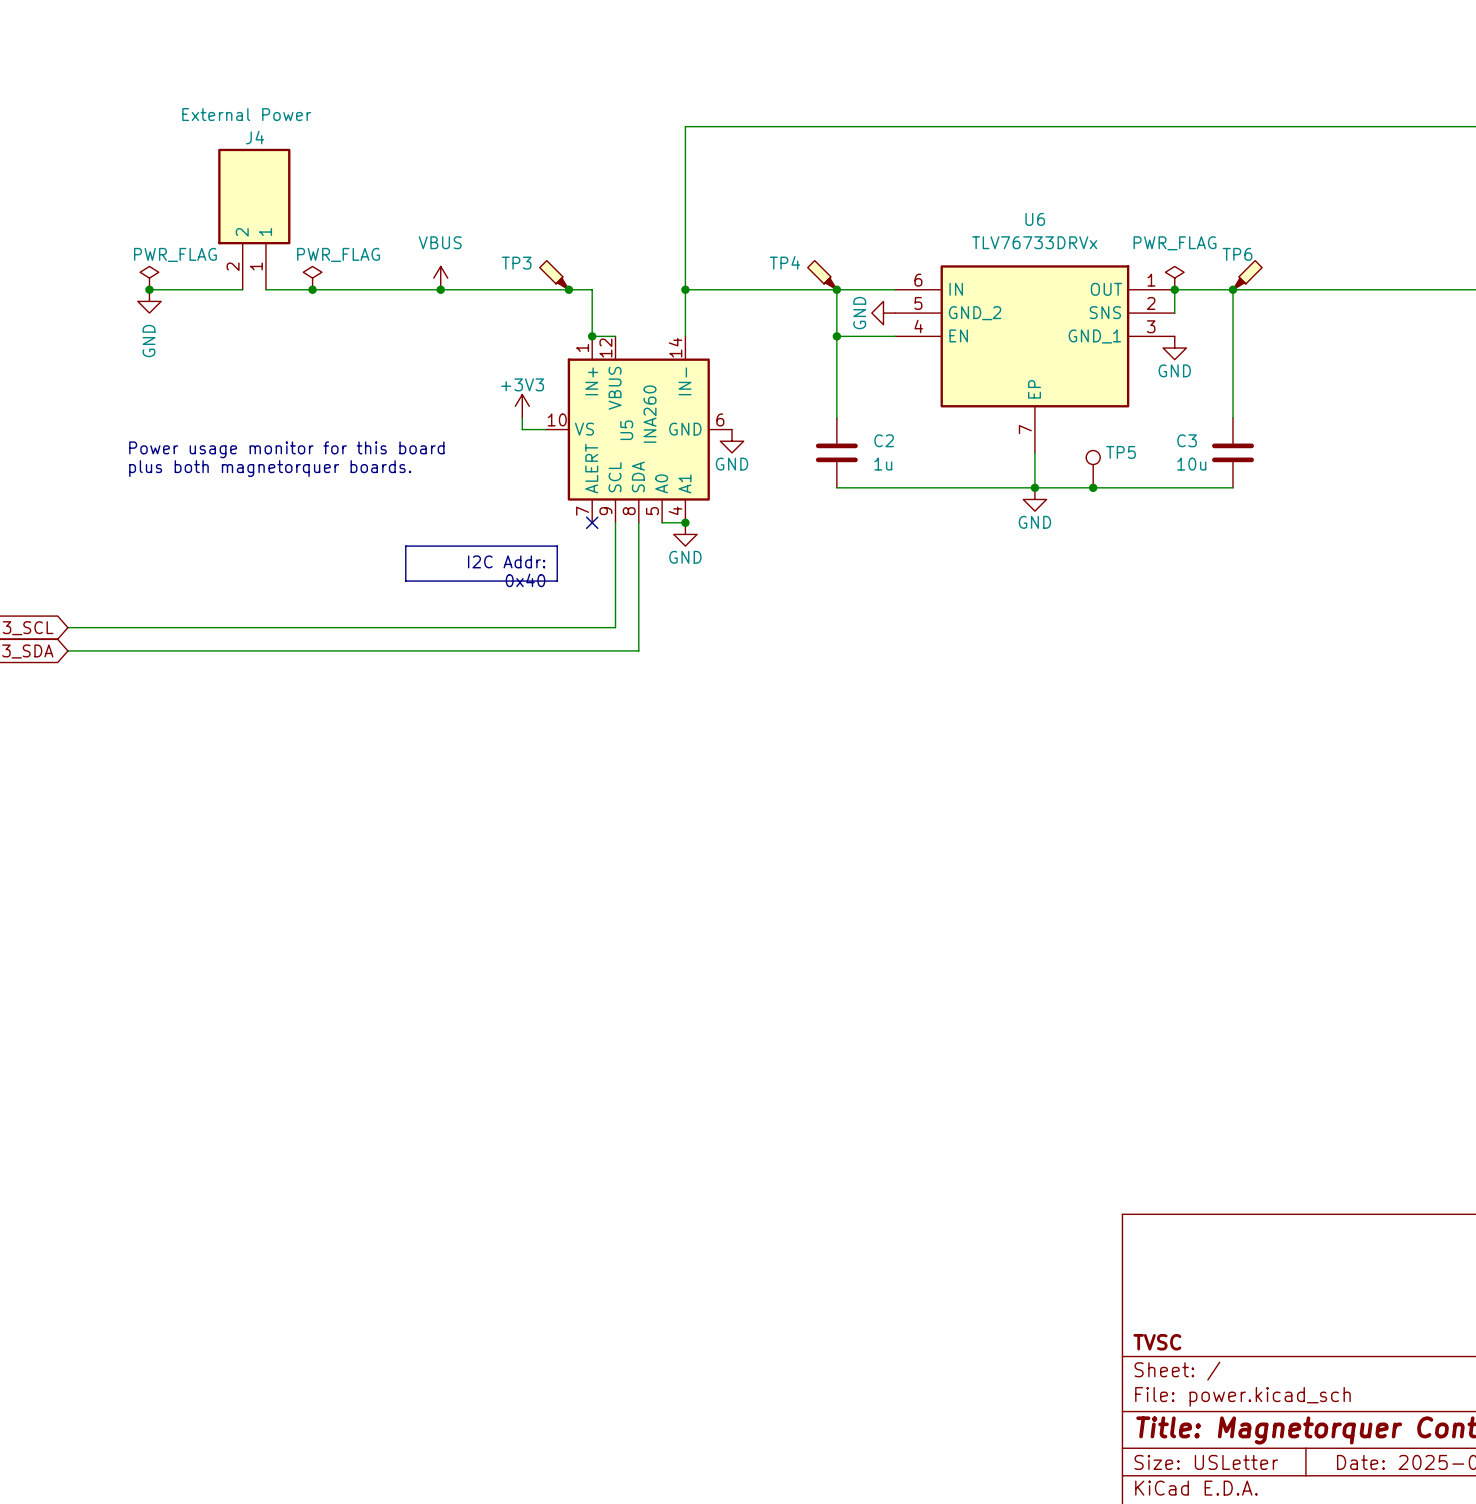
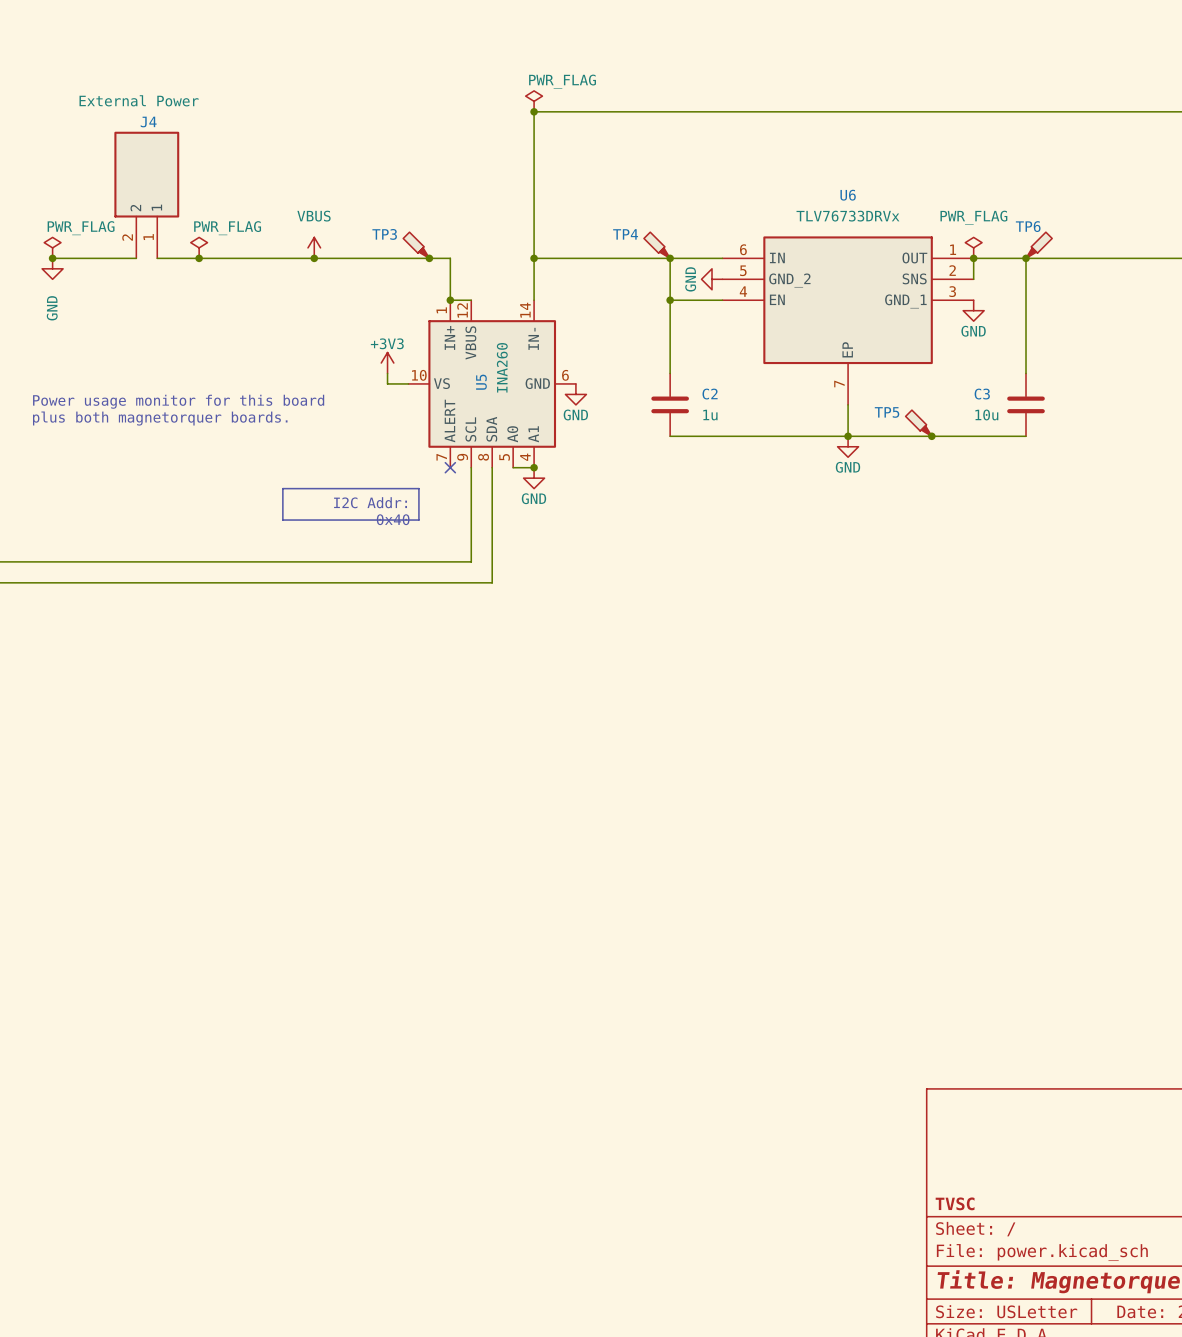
power symbol: none -> PWR_FLAG (534, 101)
junction: none -> (534, 111)
TP5 symbol: [1086, 450, 1101, 488] -> [905, 410, 932, 437]
TP5 name position: TP5 (1121, 452) -> TP5 (887, 412)
junction position: (1093, 487) -> (931, 436)

